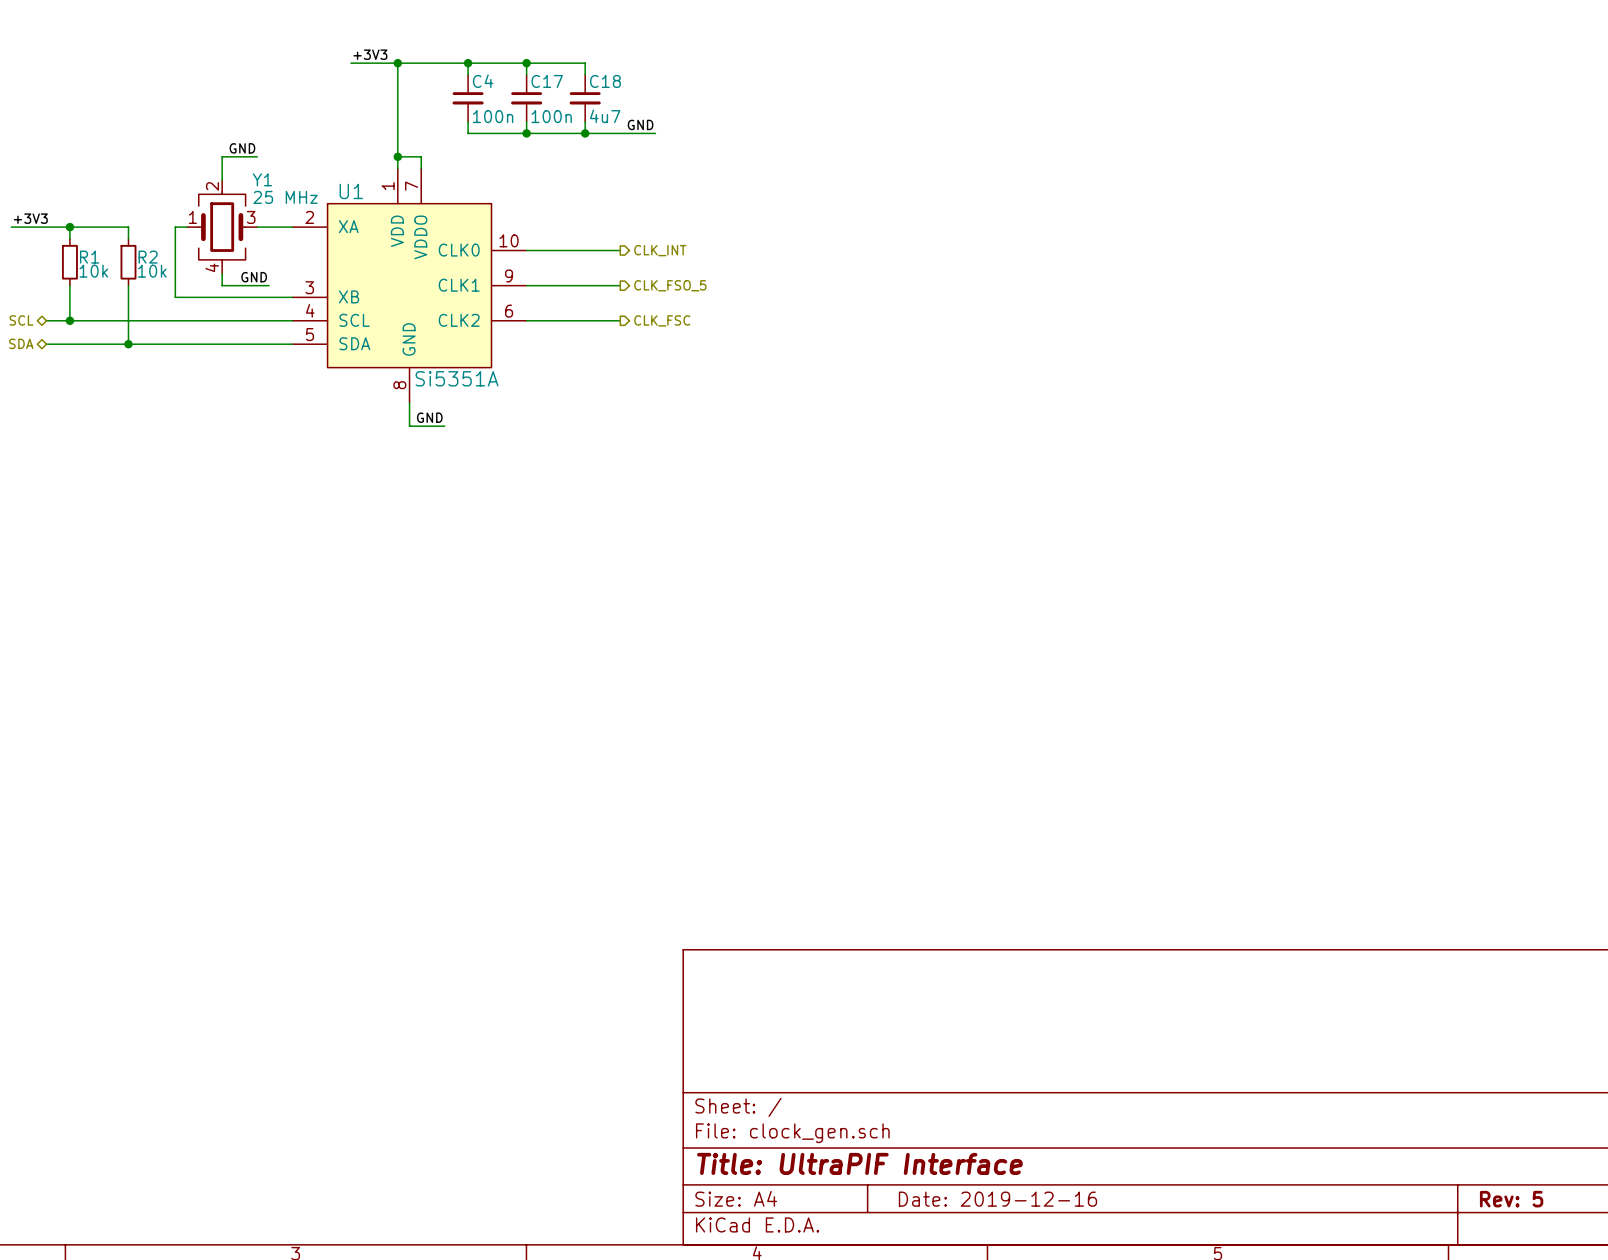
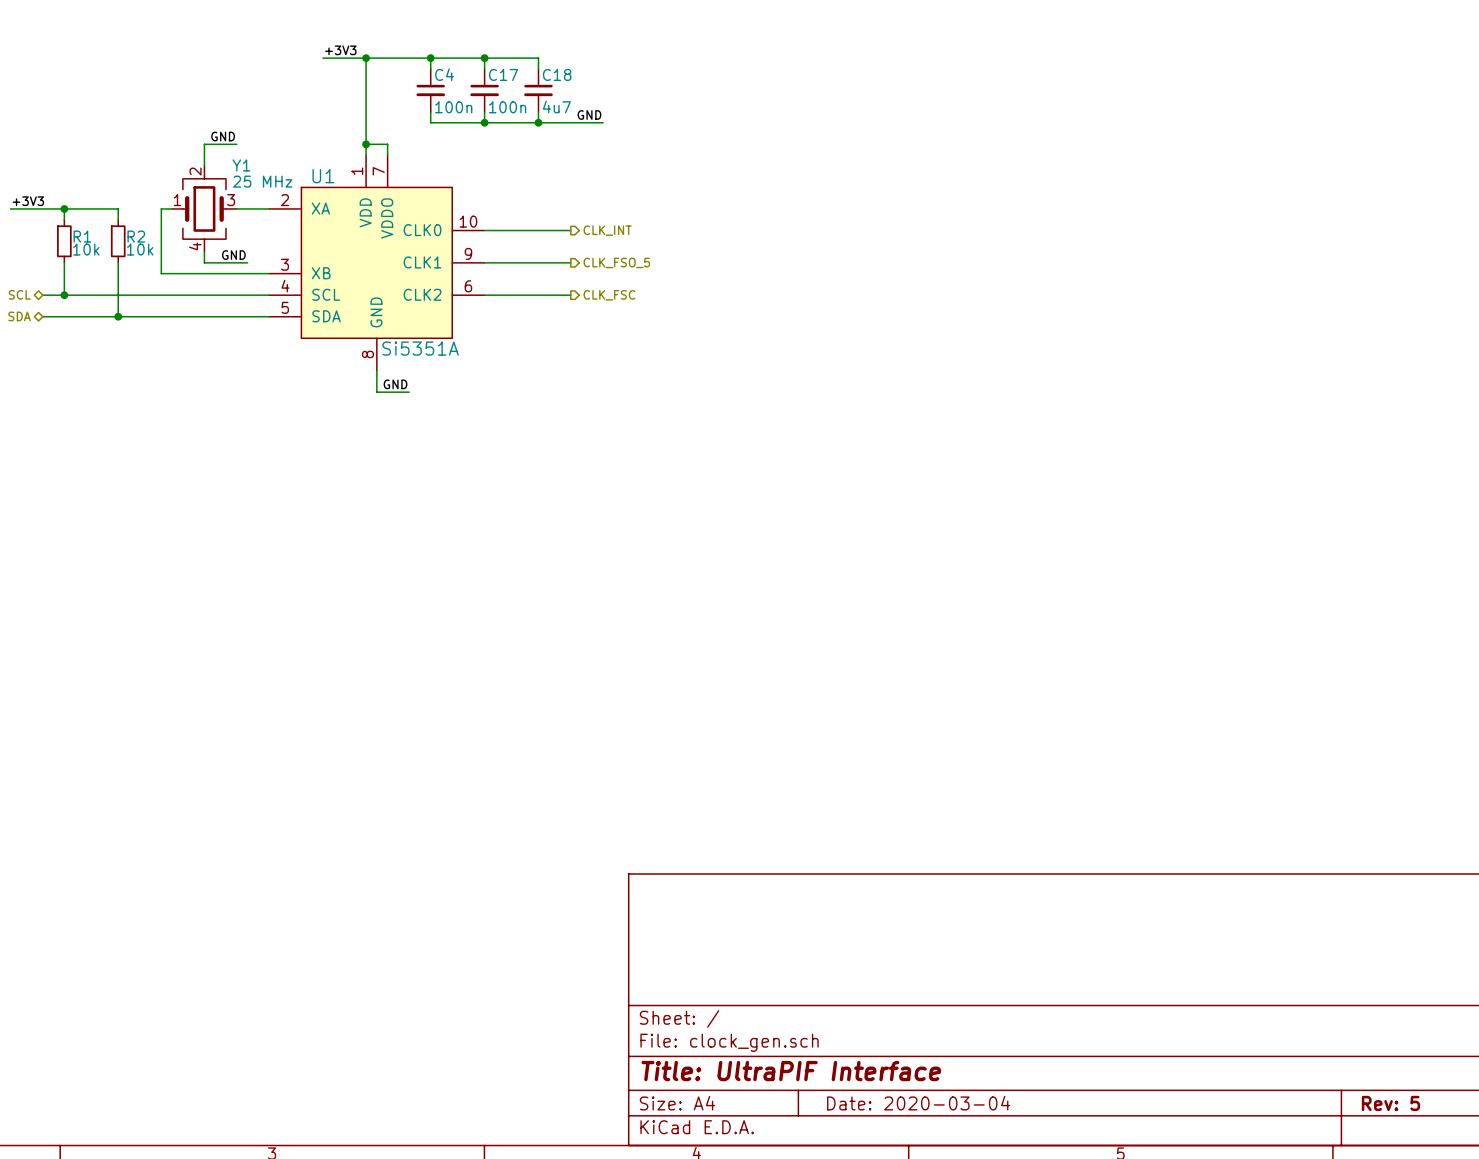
title block: Date: 2019-12-16 (997, 1199) -> Date: 2020-03-04 (918, 1103)

